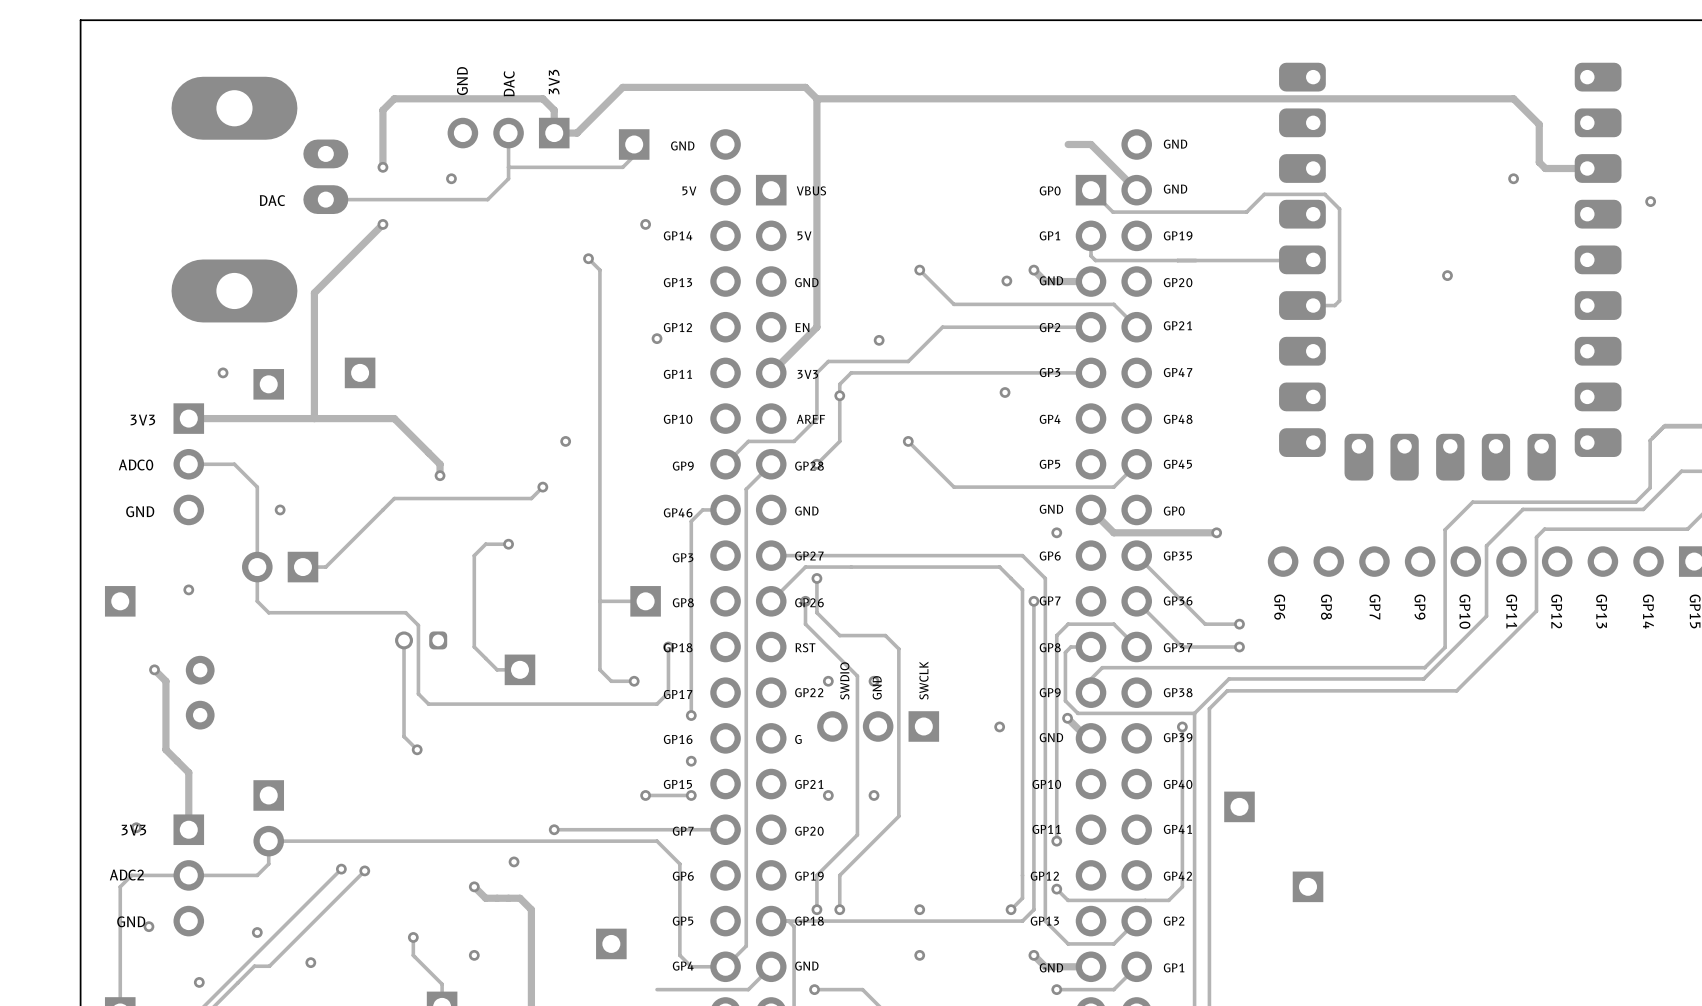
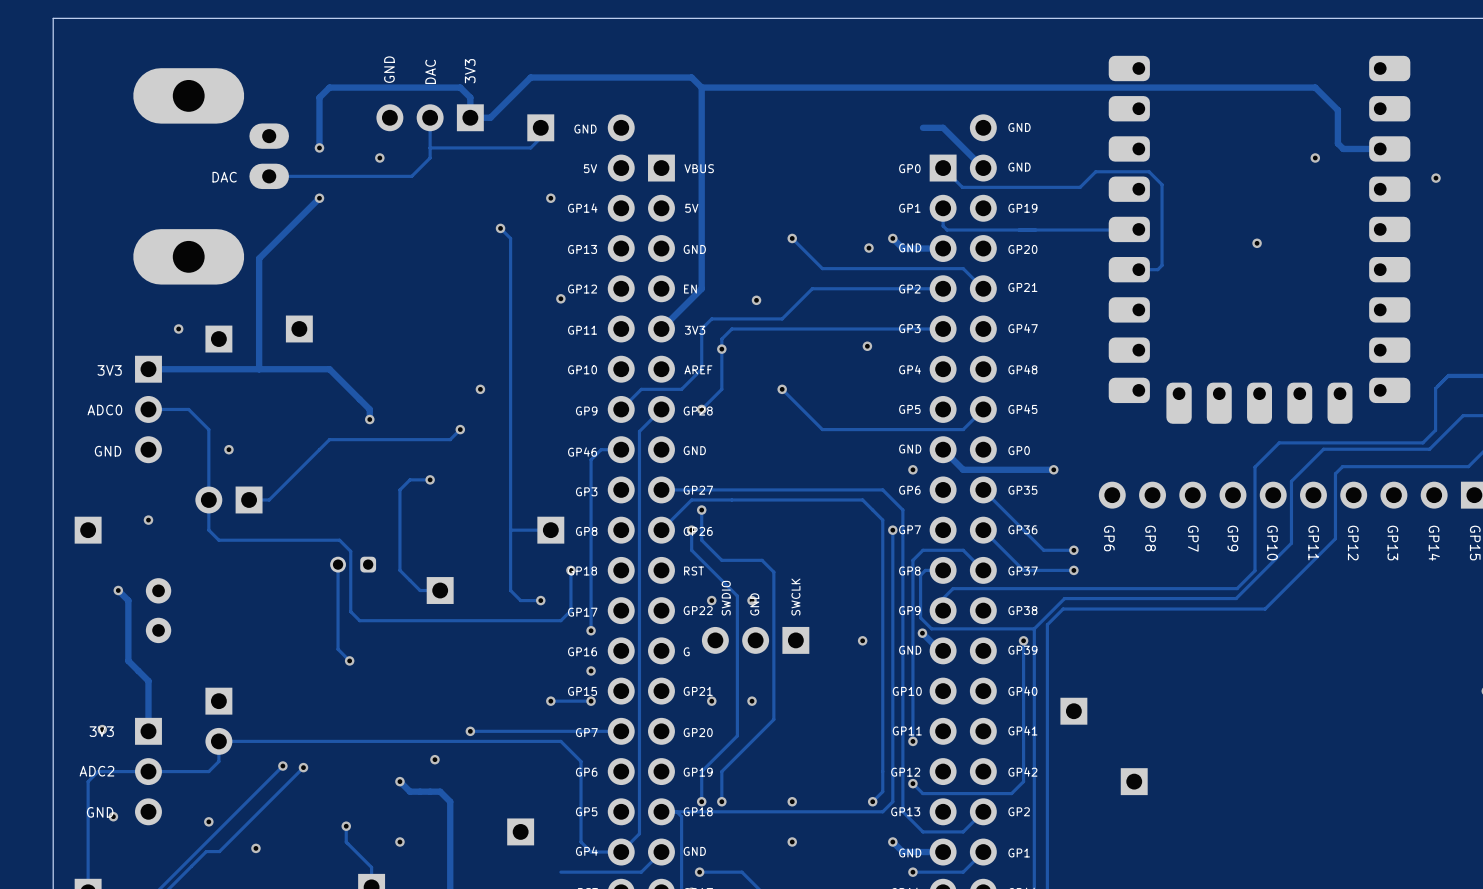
via: (199, 982) -> none

